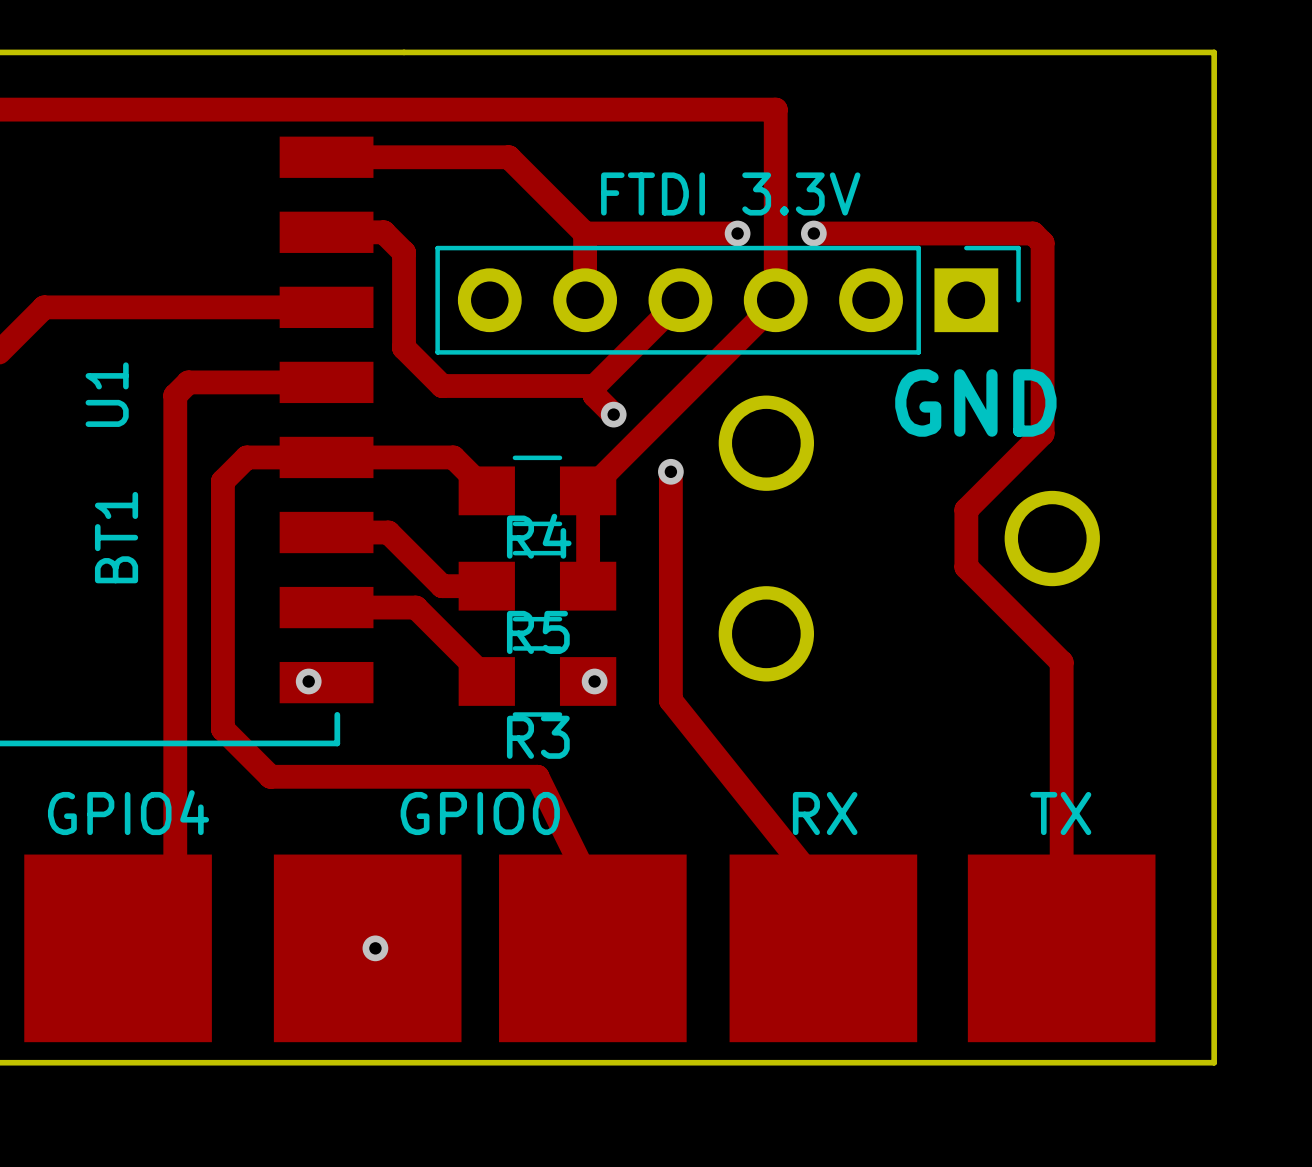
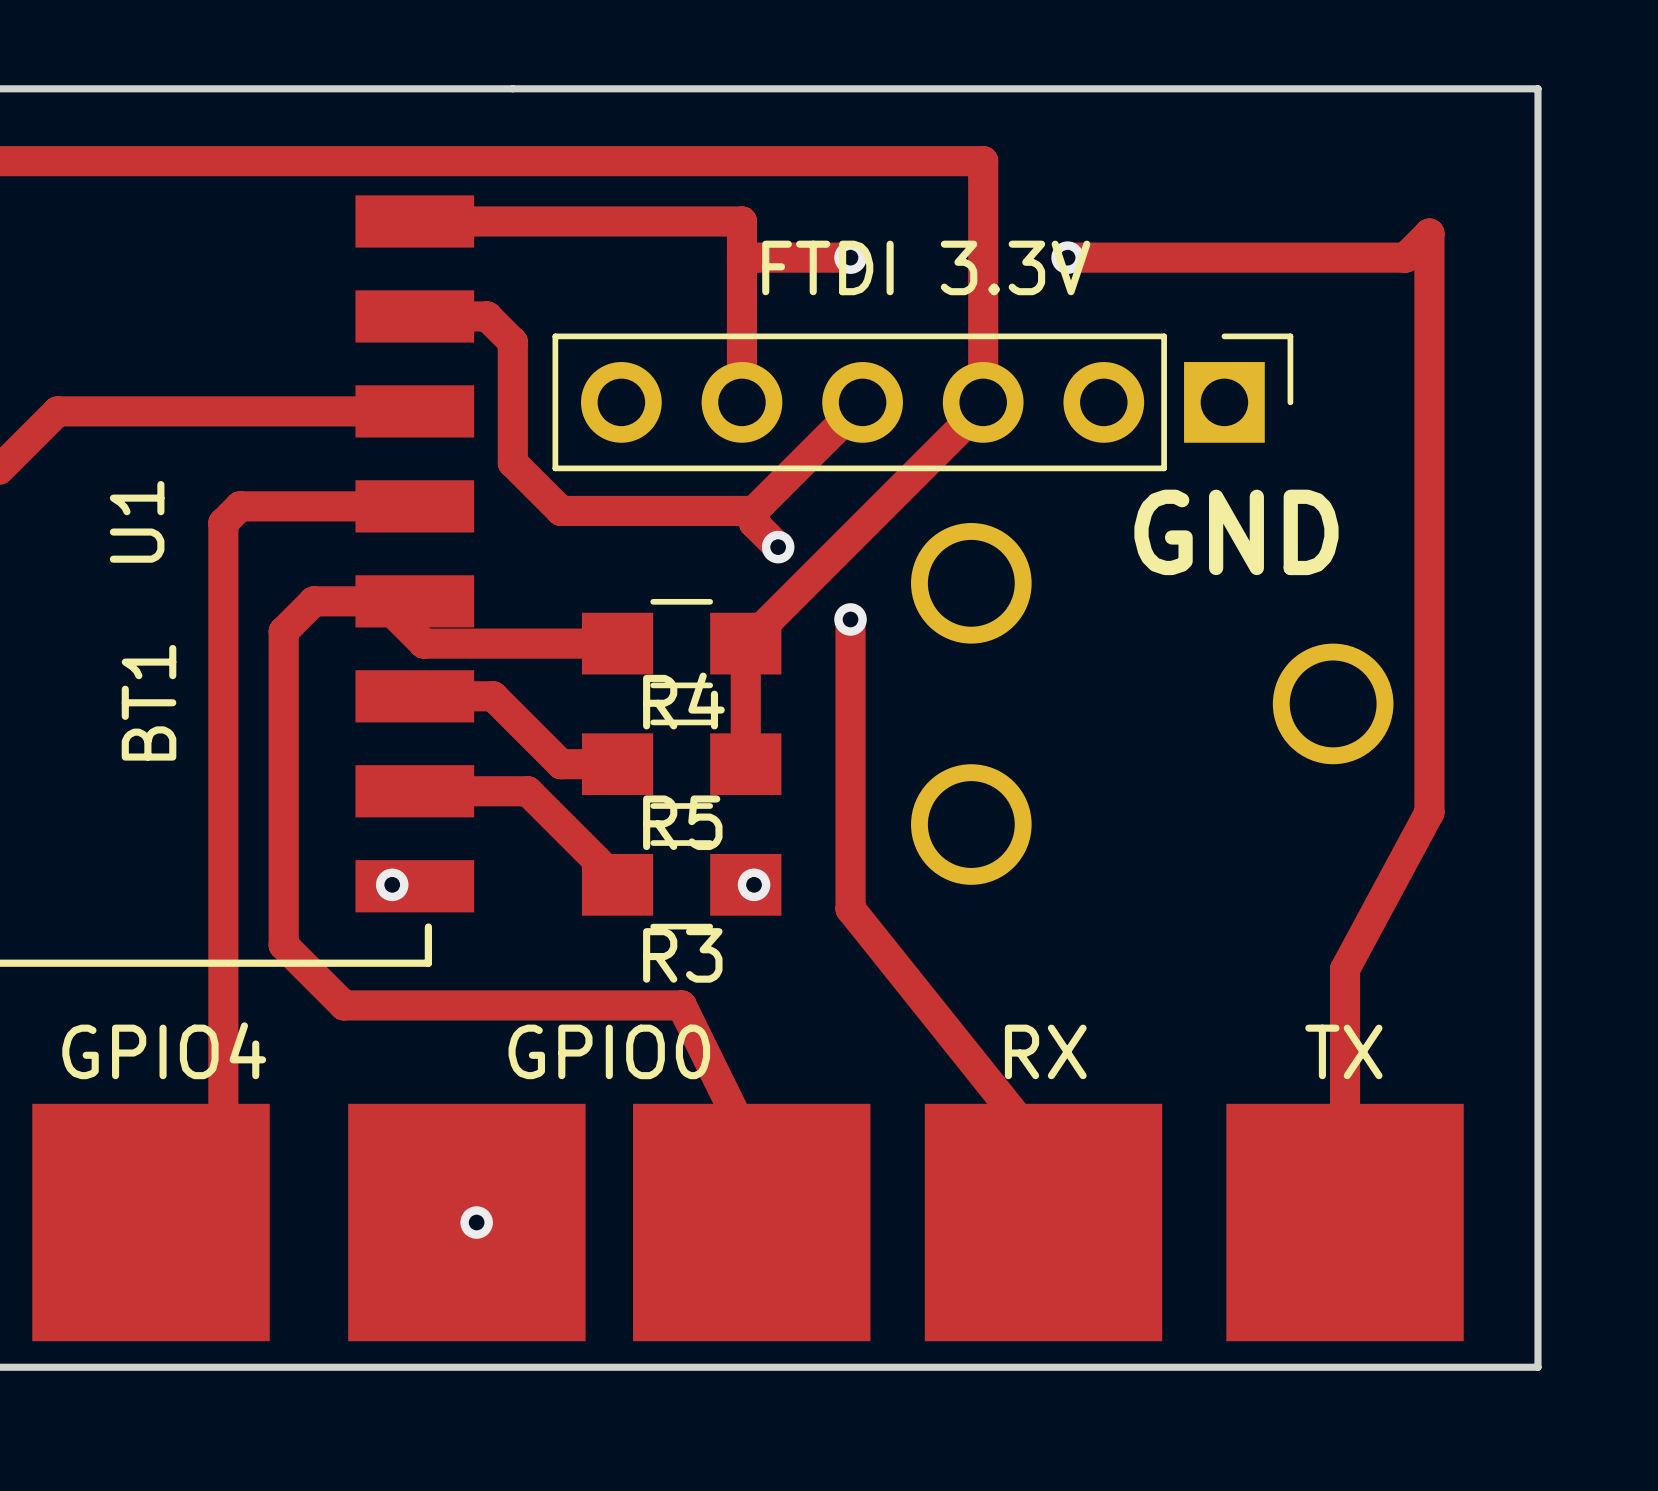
track: (508, 157) (585, 233) (737, 233) -> (645, 221) (741, 221) (741, 317)
track: none -> (741, 257) (850, 257)
via: none -> (850, 257)
via: (737, 233) -> none
track: (813, 233) (1033, 233) (1042, 243) (1042, 433) (966, 509) (966, 567) (1061, 662) (1061, 748) -> (1067, 257) (1405, 257) (1429, 233) (1429, 812) (1345, 969)
via position: (813, 233) -> (1067, 257)
track: (300, 457) (453, 457) (486, 490) -> (381, 601) (423, 643) (617, 643)

